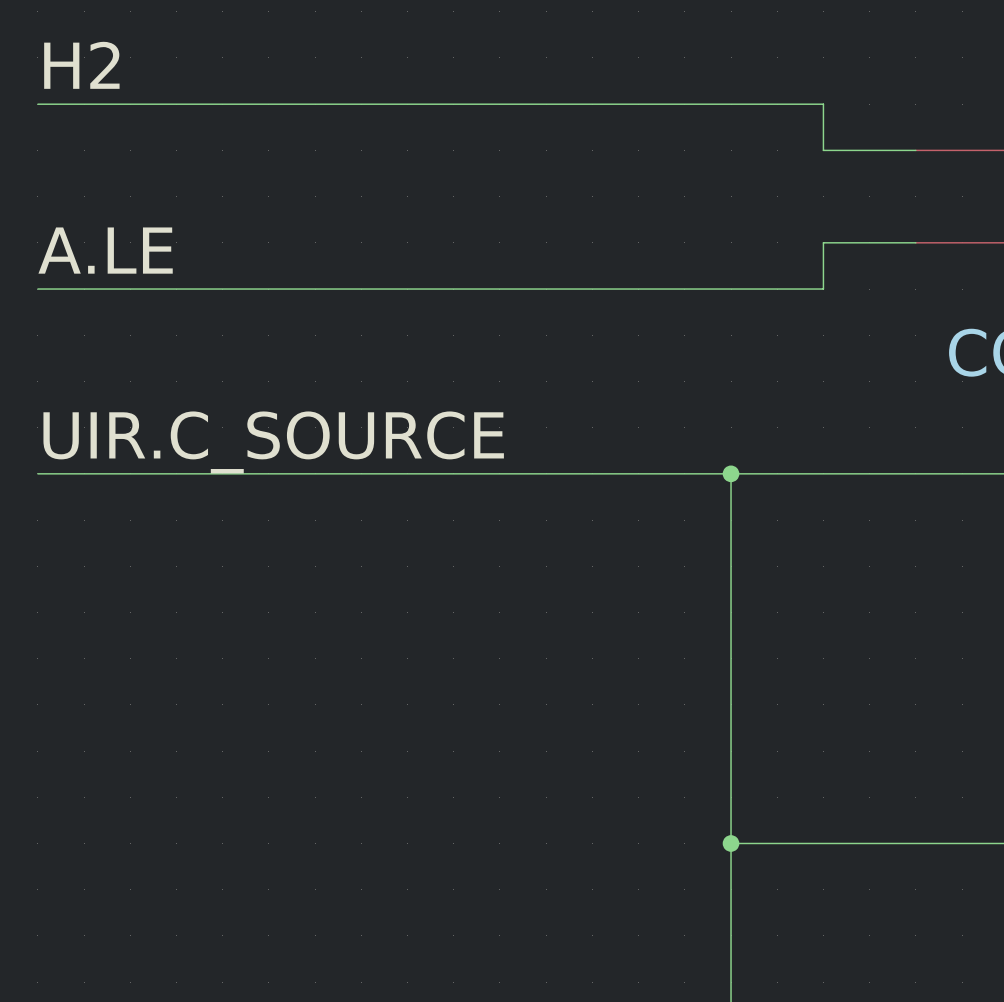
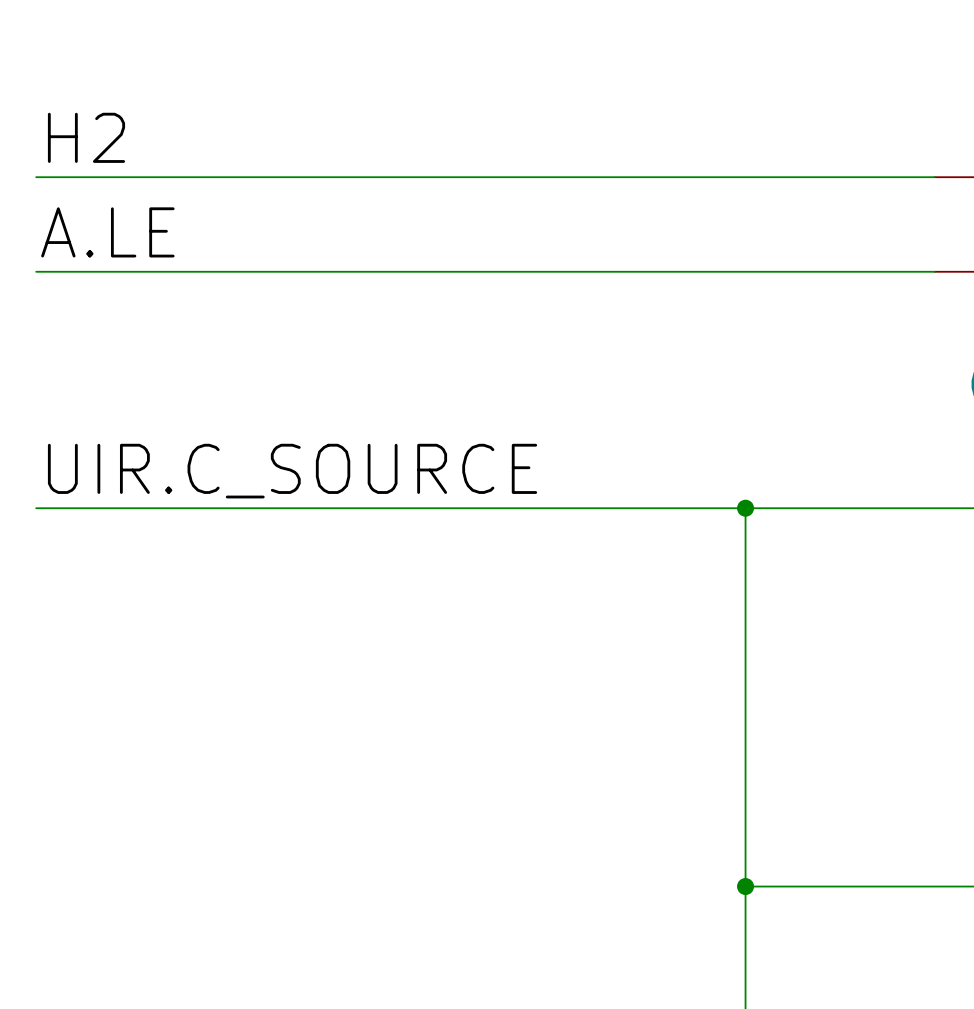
label position: H2 (81, 65) -> H2 (86, 137)
wire: (37, 104) (823, 104) (823, 150) -> (36, 177) (840, 177)
wire: (823, 242) (823, 289) (37, 289) -> (840, 271) (36, 271)
label position: A.LE (105, 250) -> A.LE (107, 232)

